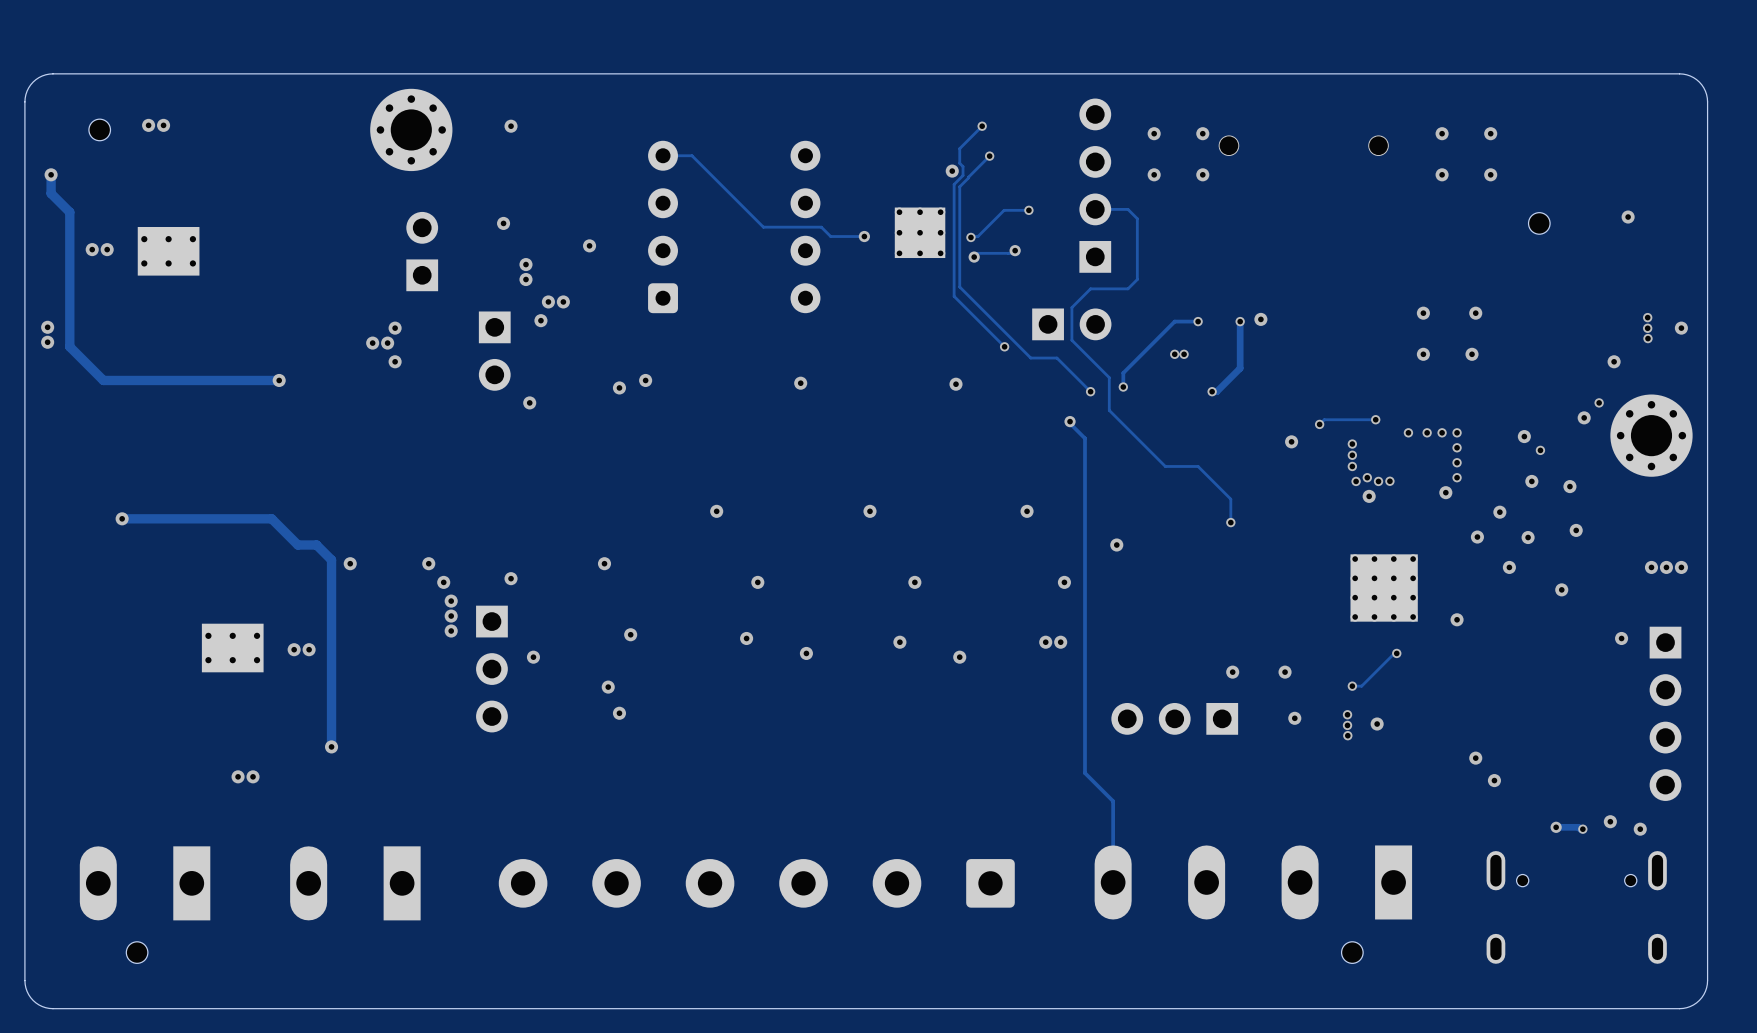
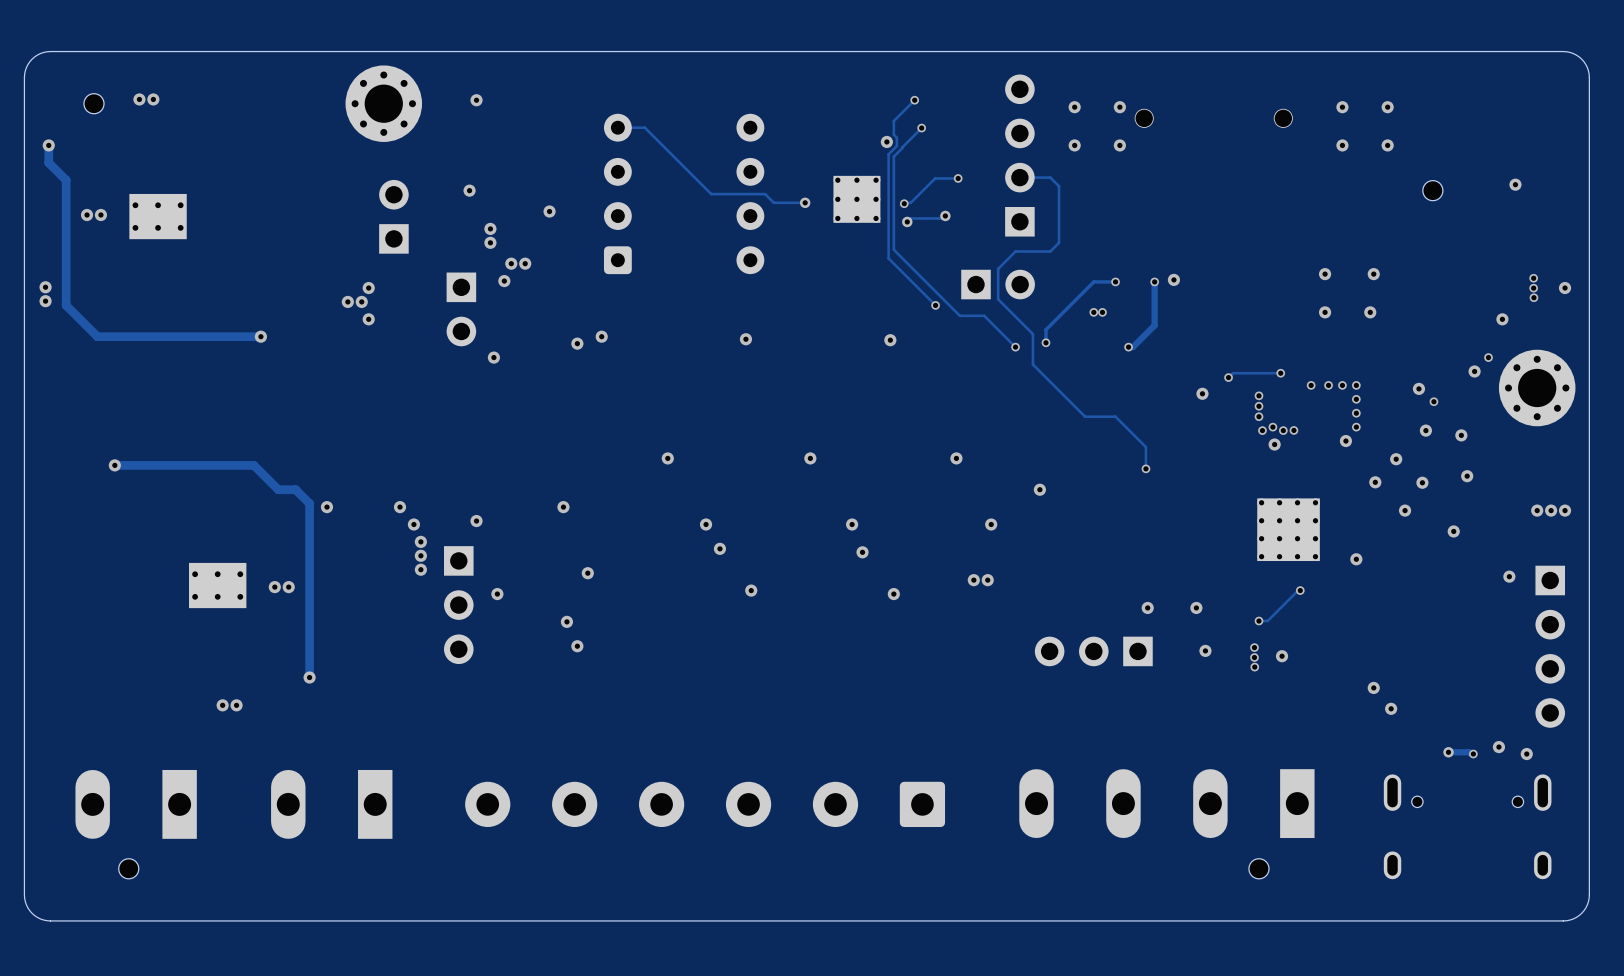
track: (1070, 421) (1085, 438) (1085, 773) (1113, 801) (1113, 882) -> none
via: (1070, 421) -> none
via position: (746, 638) -> (719, 548)
via position: (899, 642) -> (862, 552)

